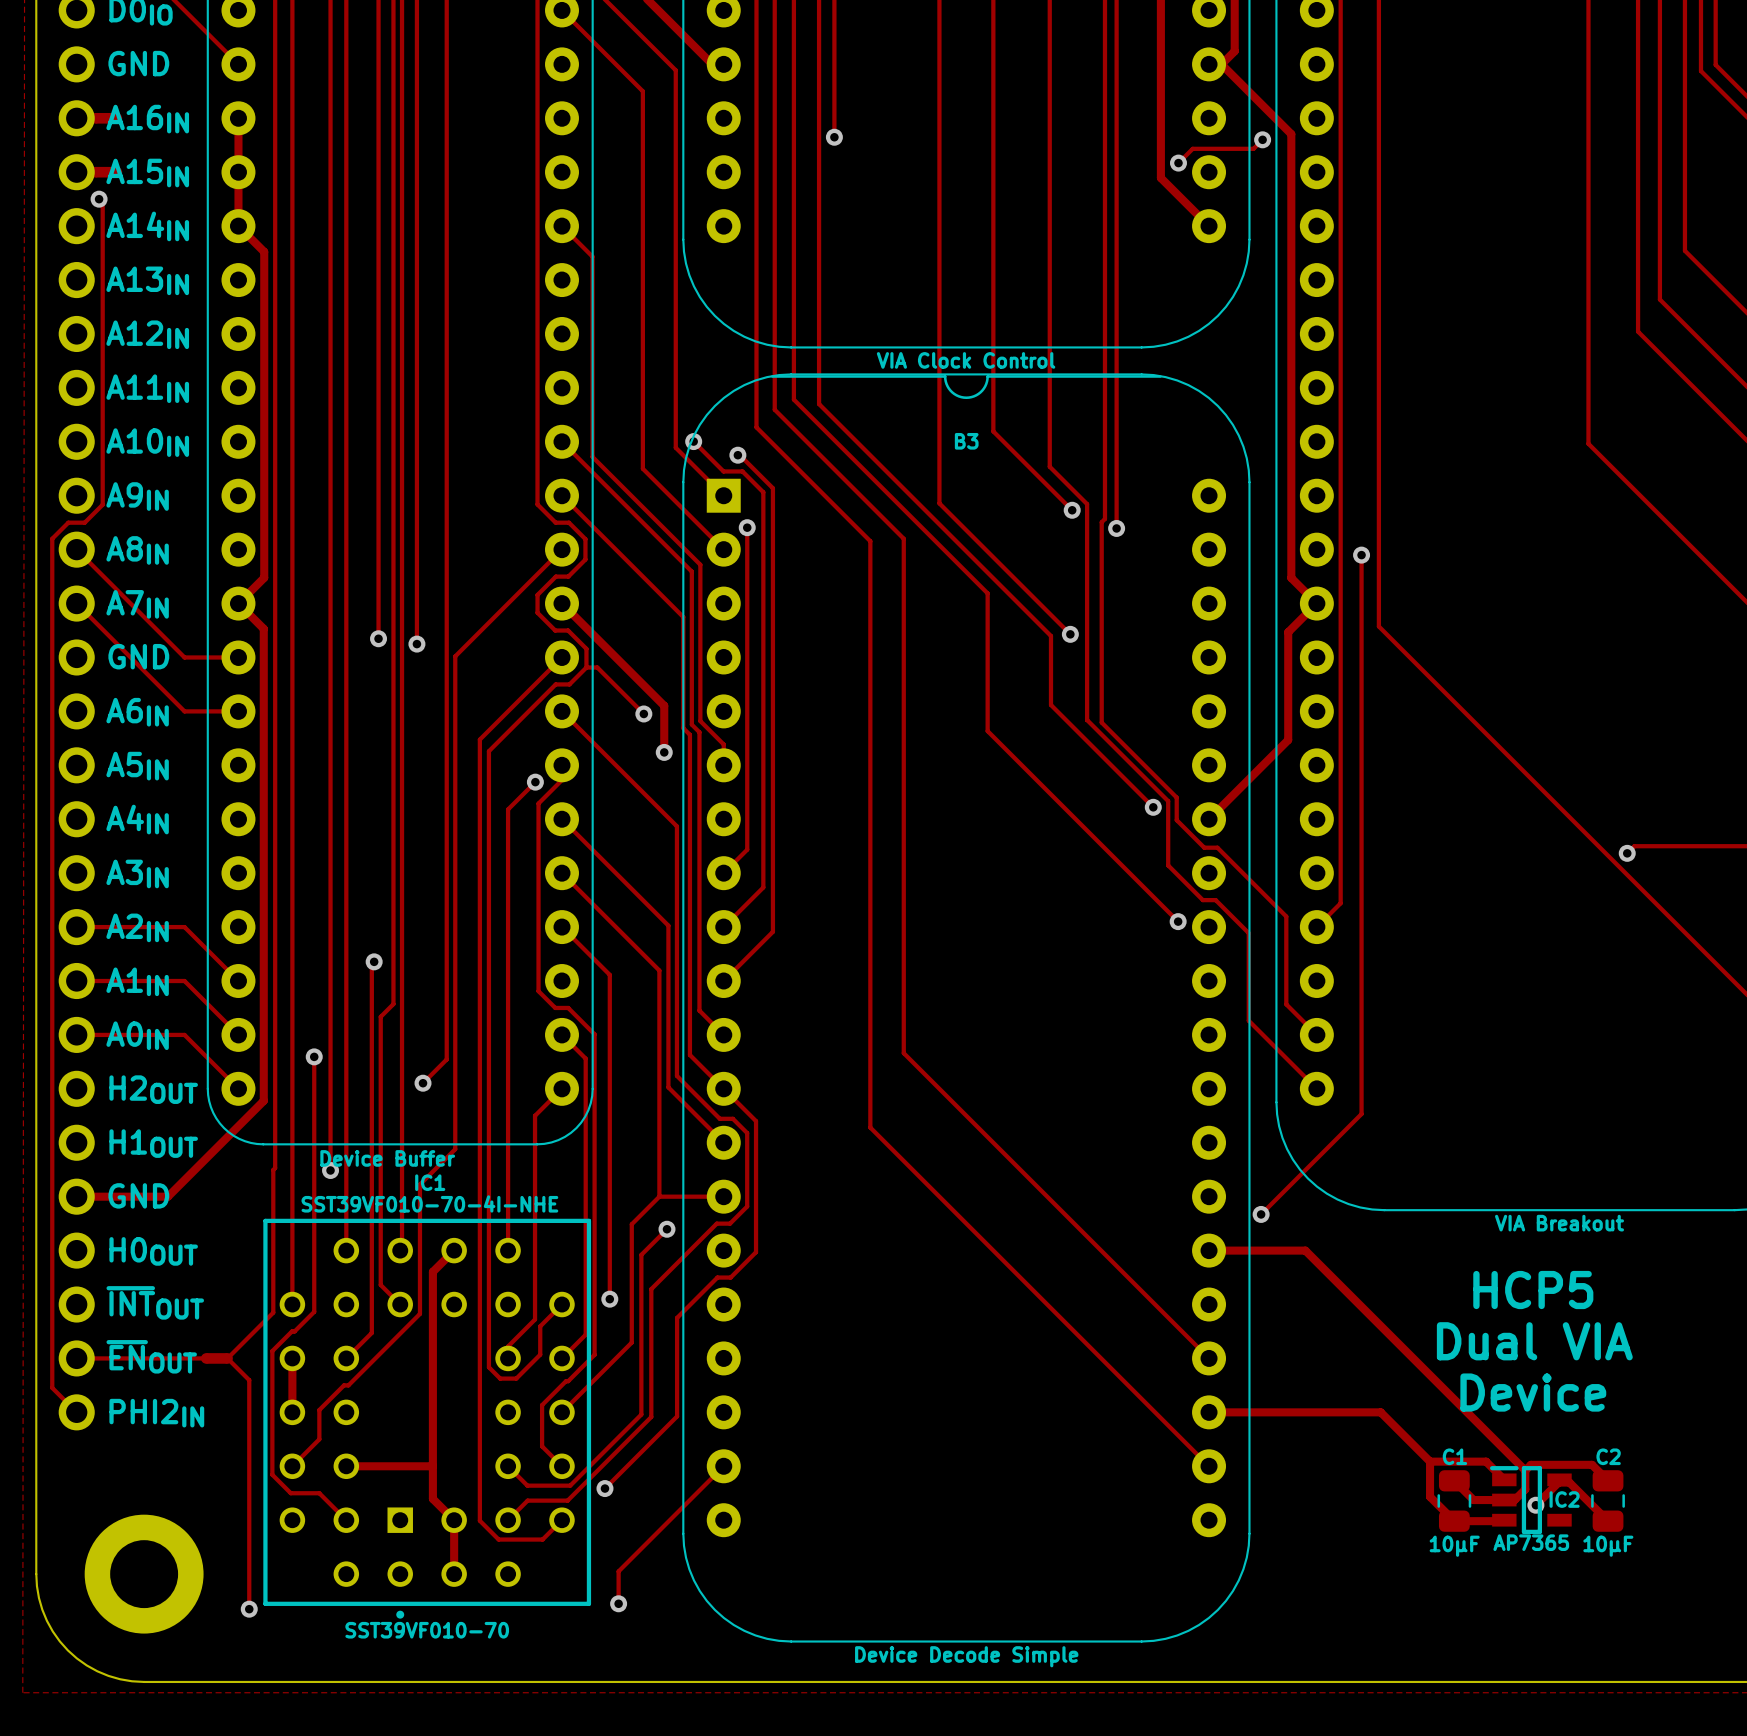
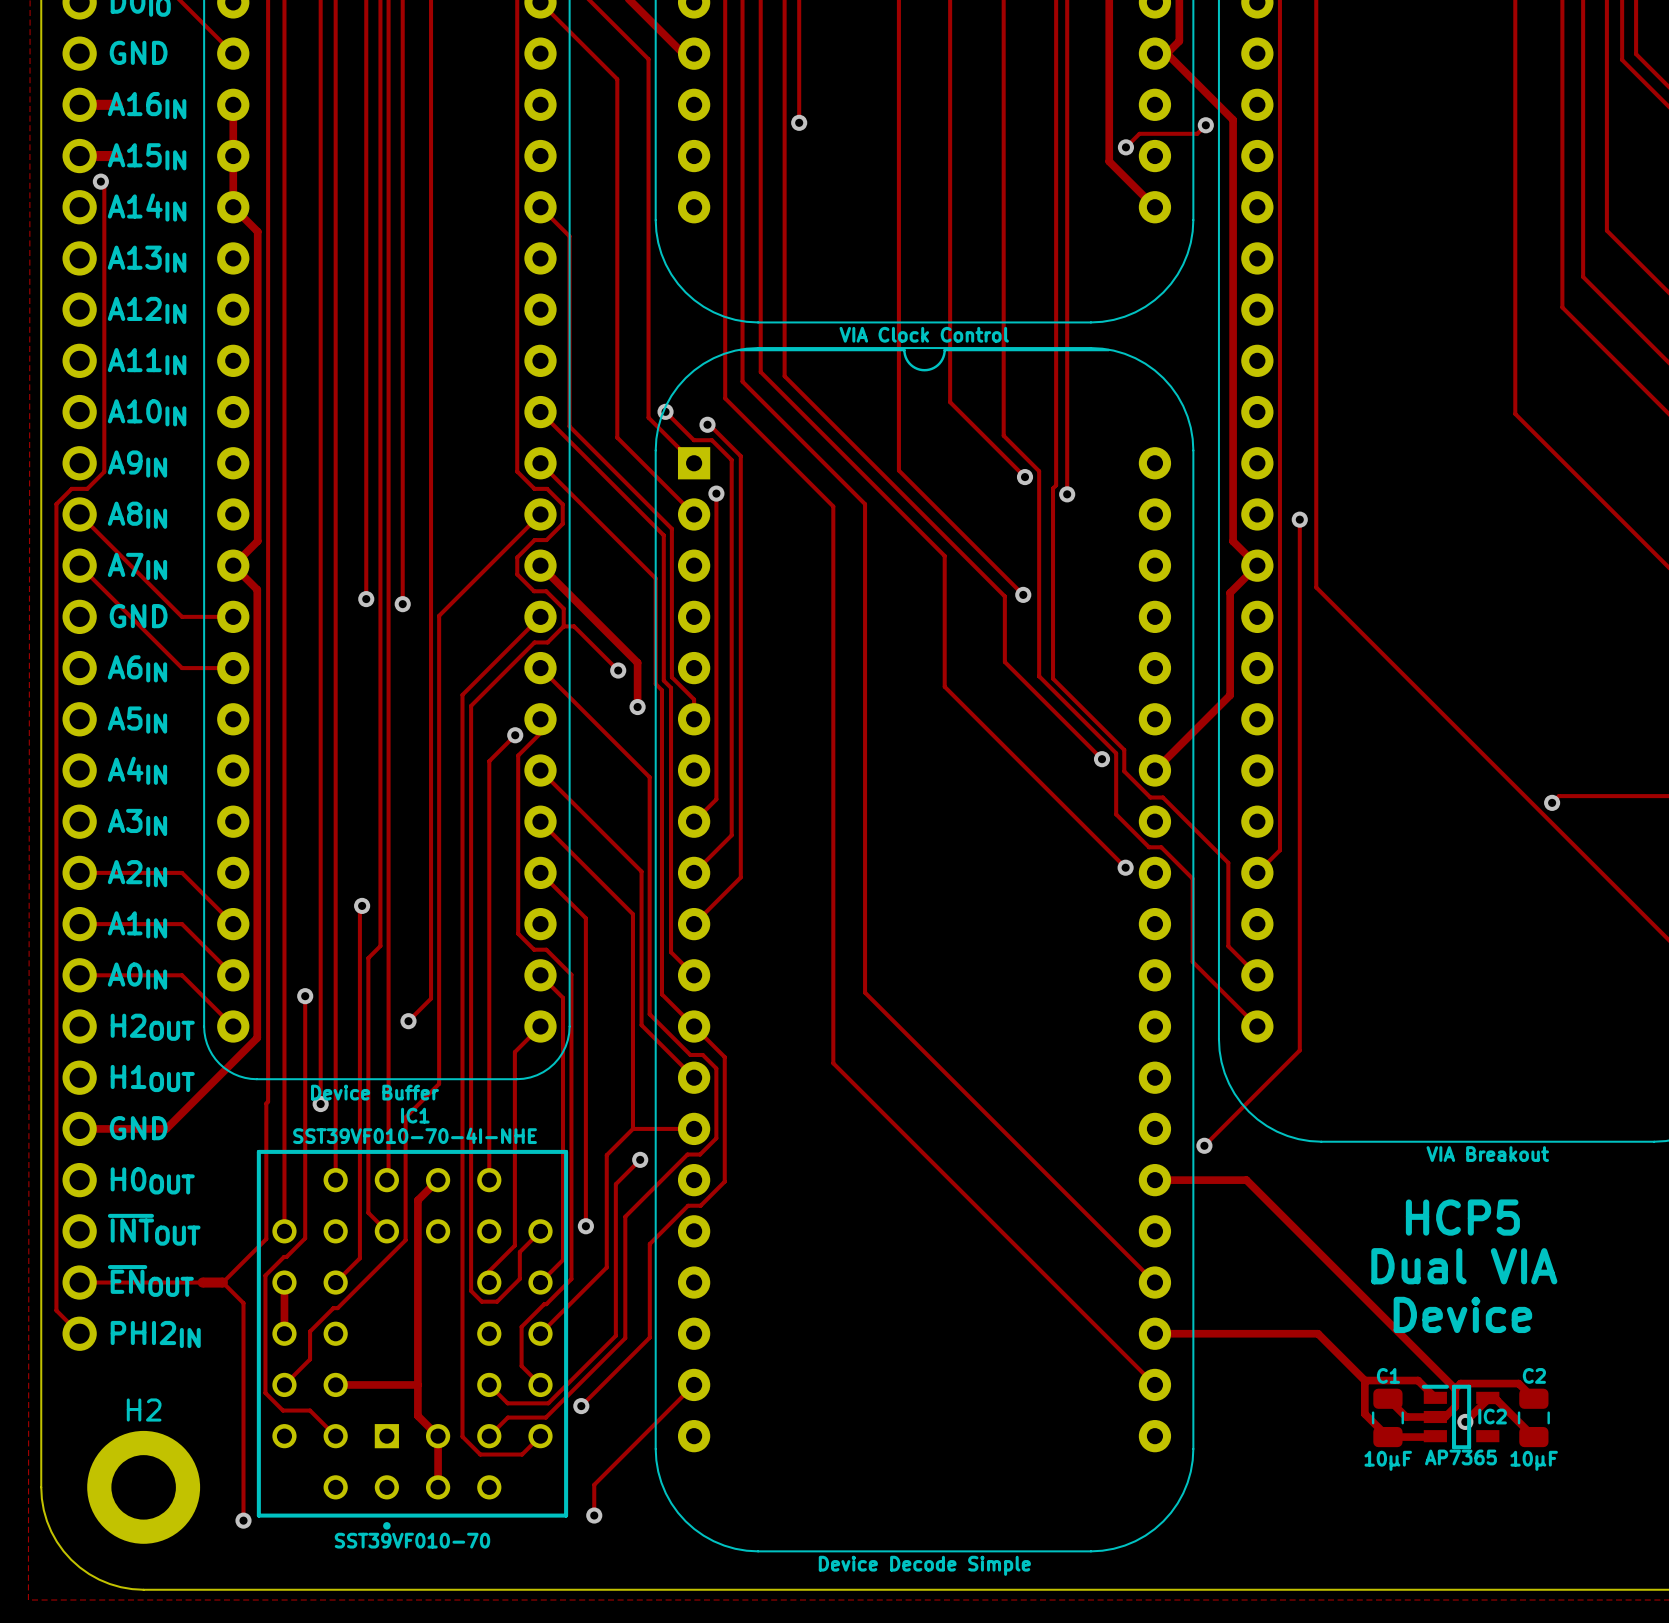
B3 name: B3 (966, 441) -> none
H2 name: none -> H2 (144, 1410)

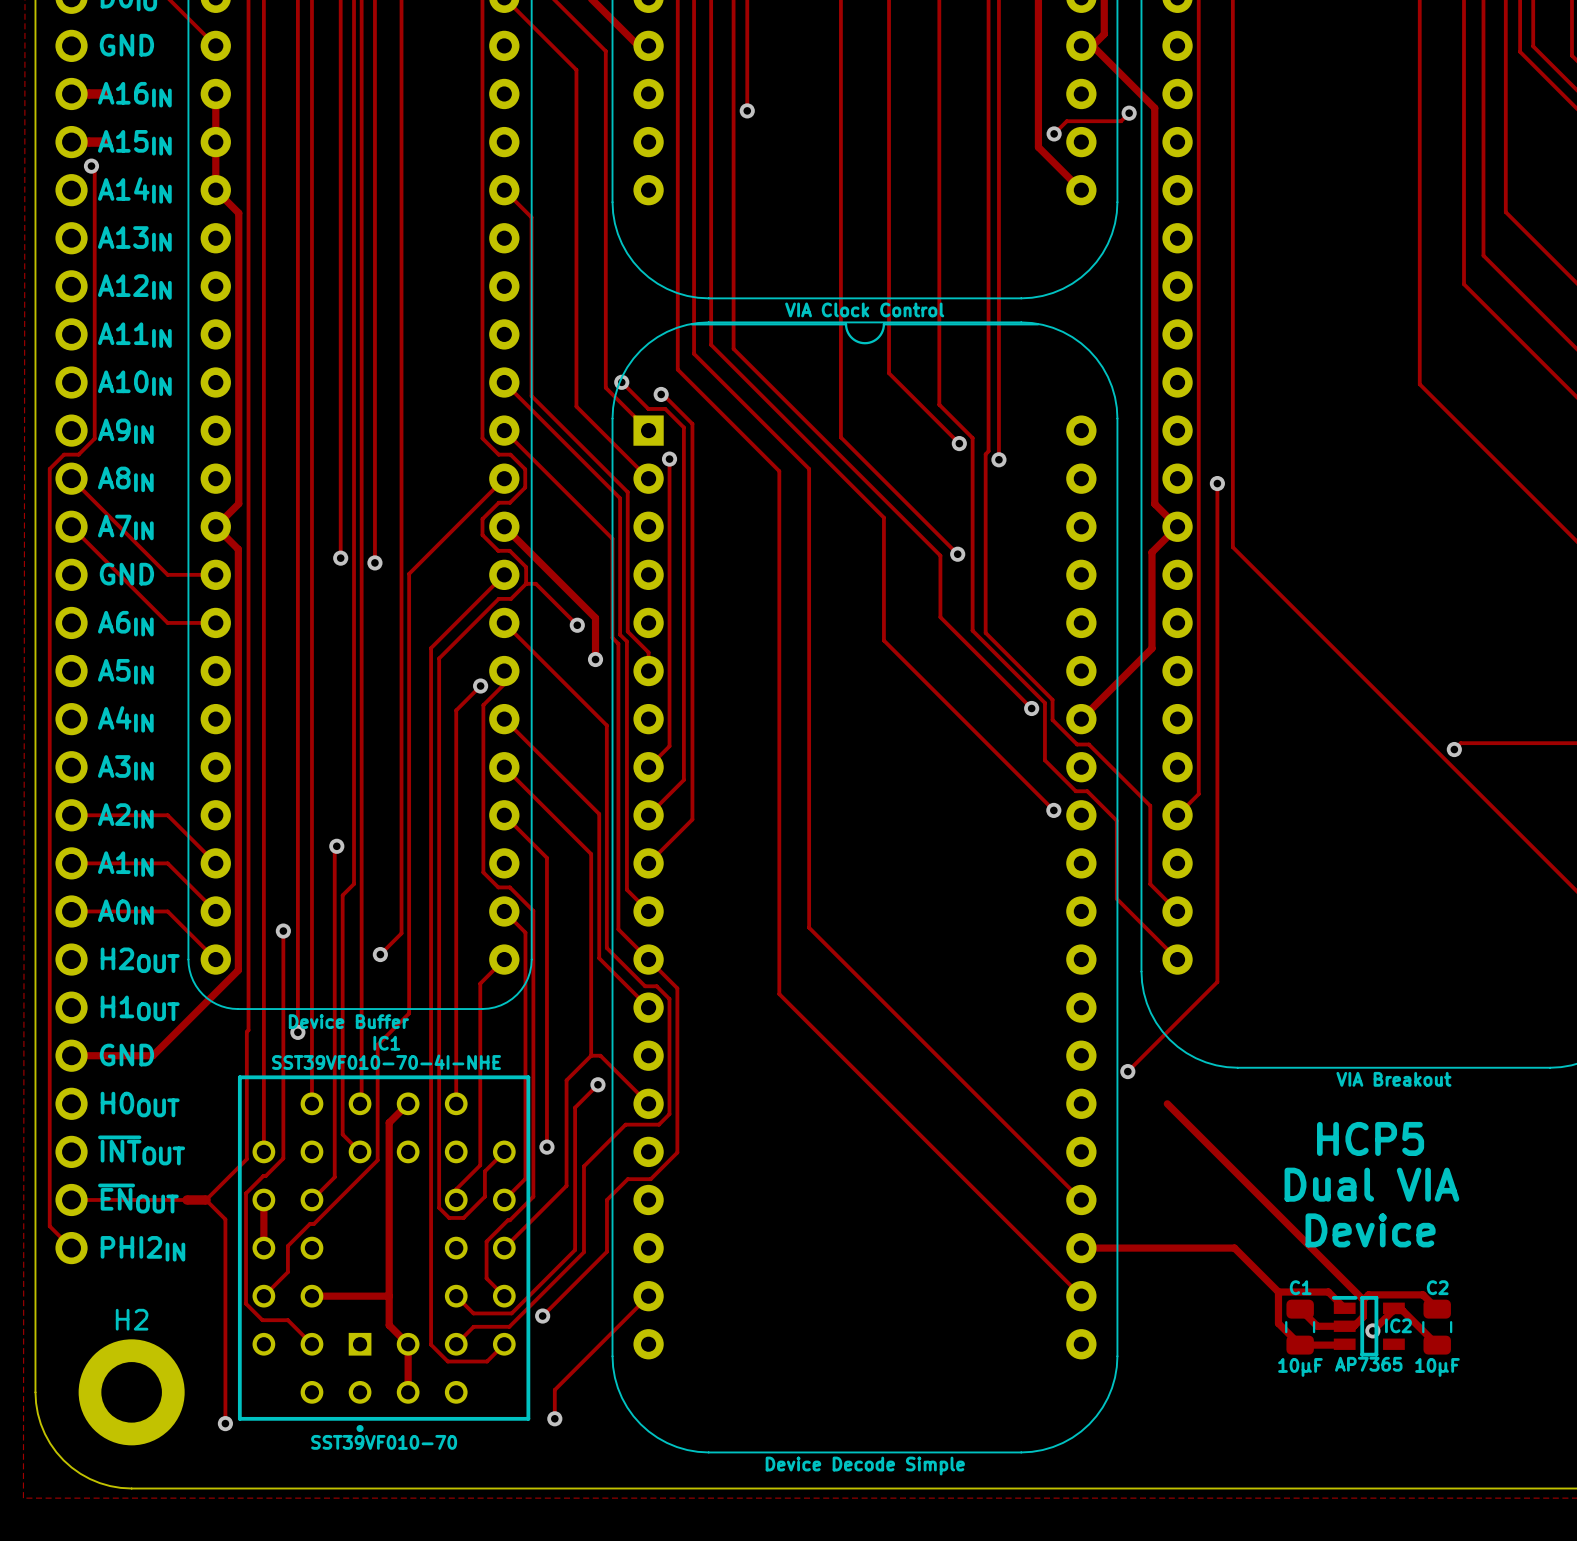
track: (642, 1128) (694, 1128) -> (600, 1055) (648, 1103)
track: (716, 1138) (700, 1154) (687, 1154) (625, 1216) (625, 1246) -> (669, 1064) (669, 1114) (659, 1124) (625, 1124) (583, 1166)
track: (1154, 1180) (1246, 1180) -> none
track: (724, 1181) (700, 1205) (688, 1205) (649, 1244) (649, 1282) -> (677, 1105) (677, 1152) (650, 1179) (627, 1179) (606, 1199)

